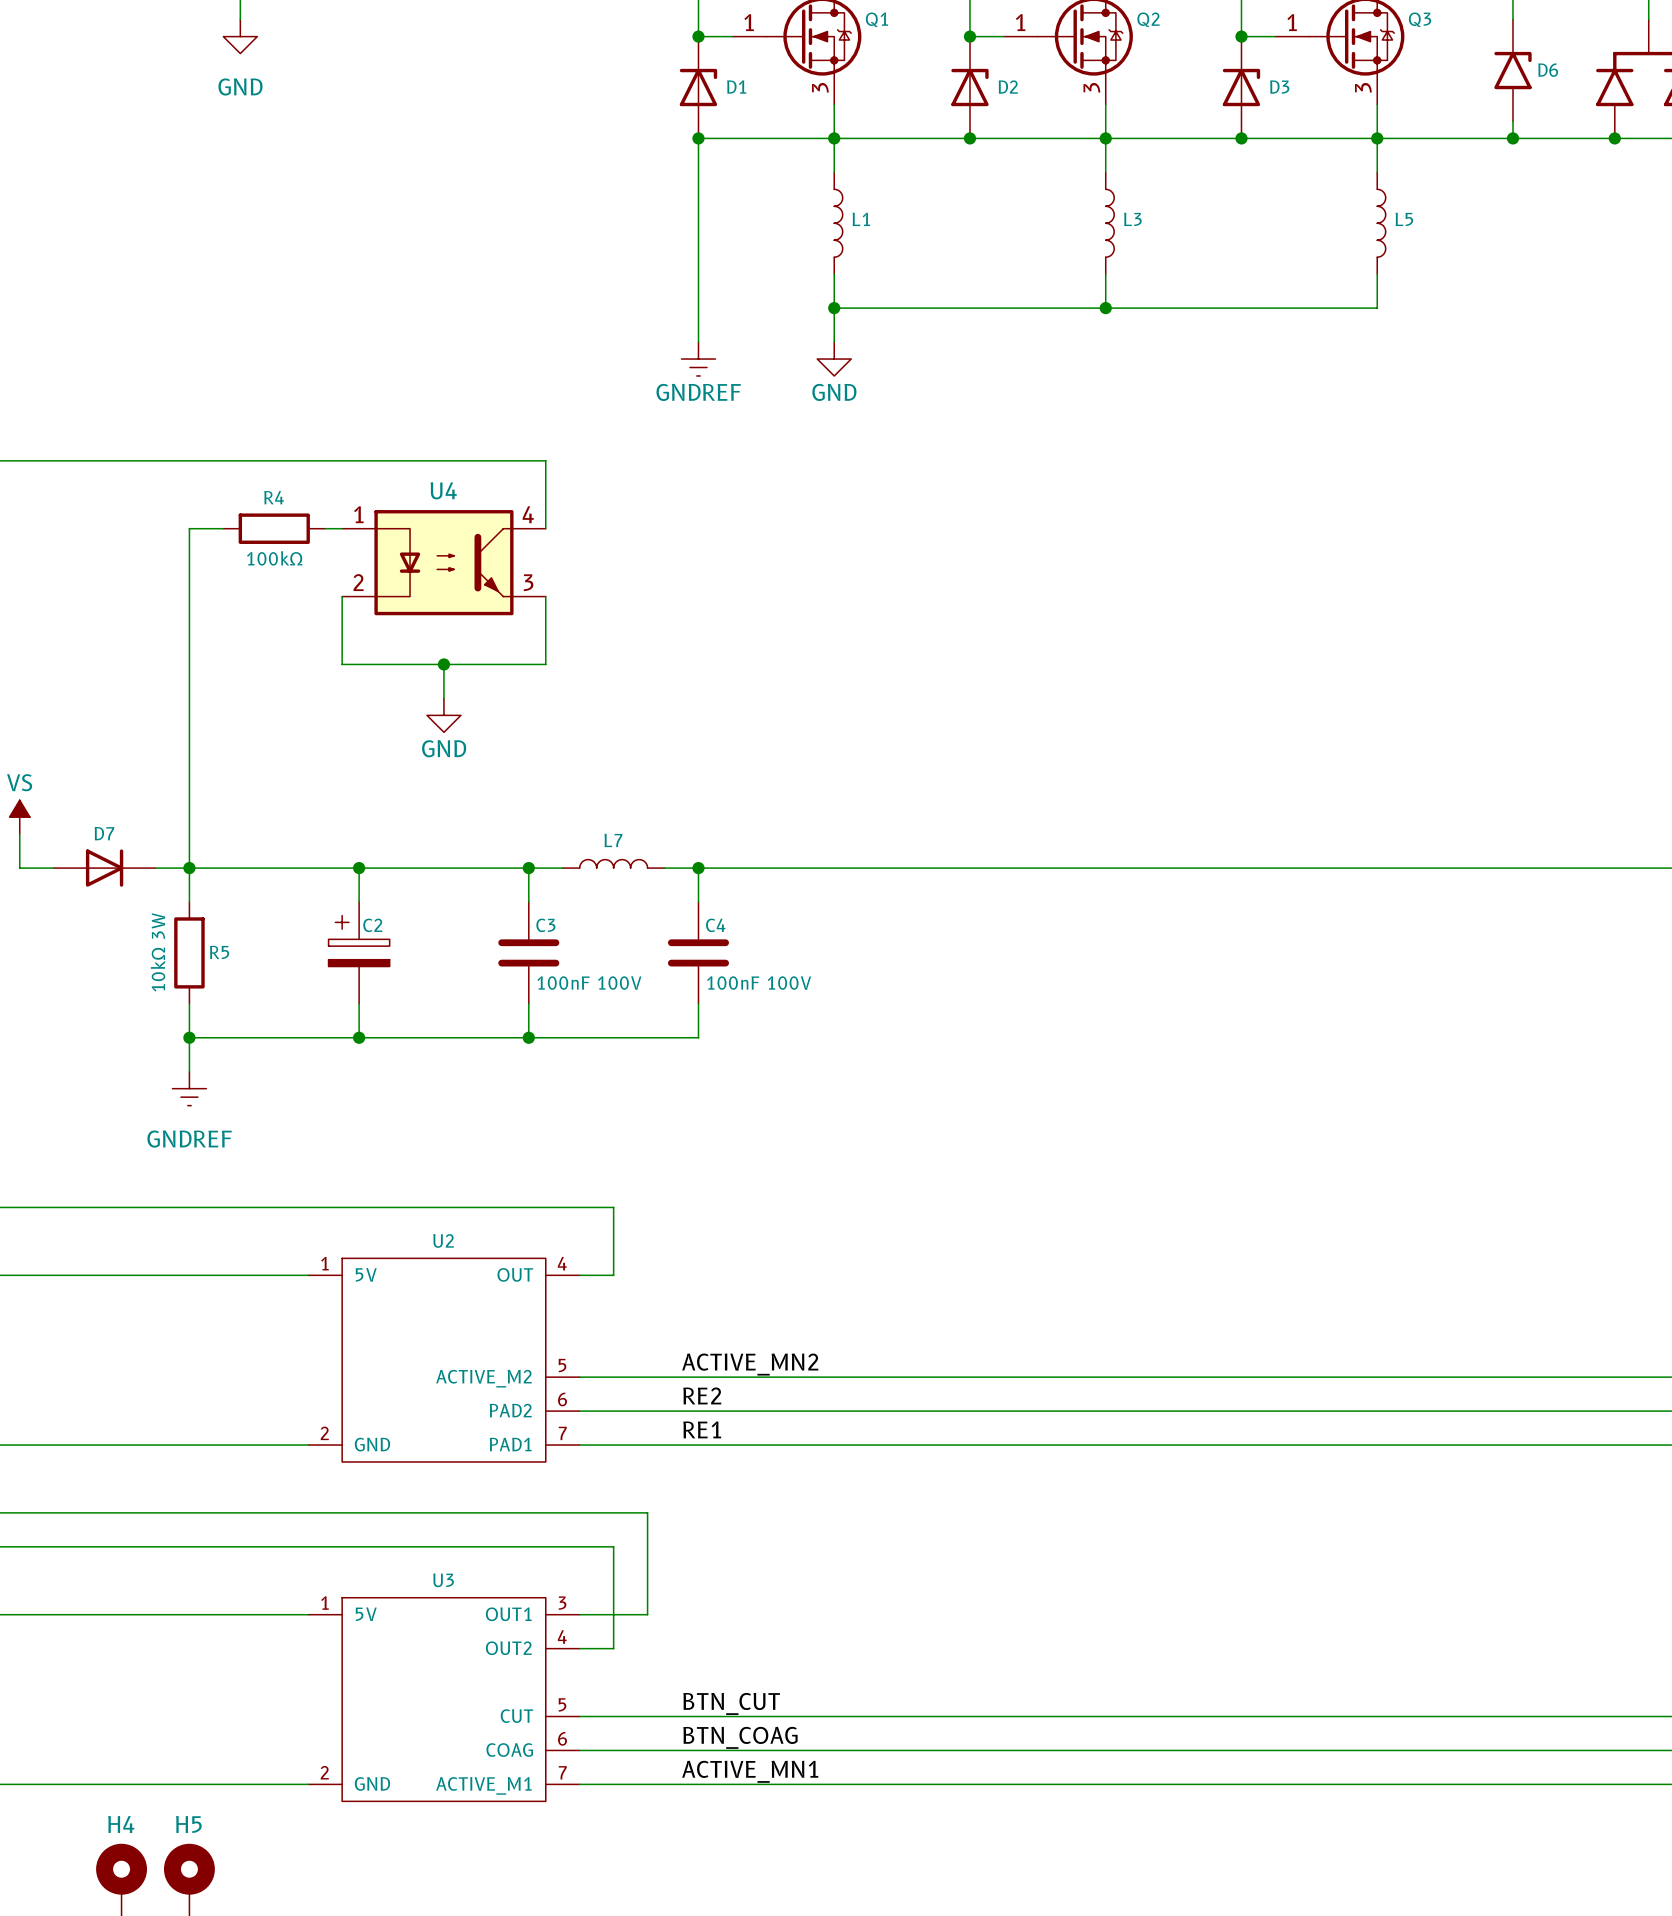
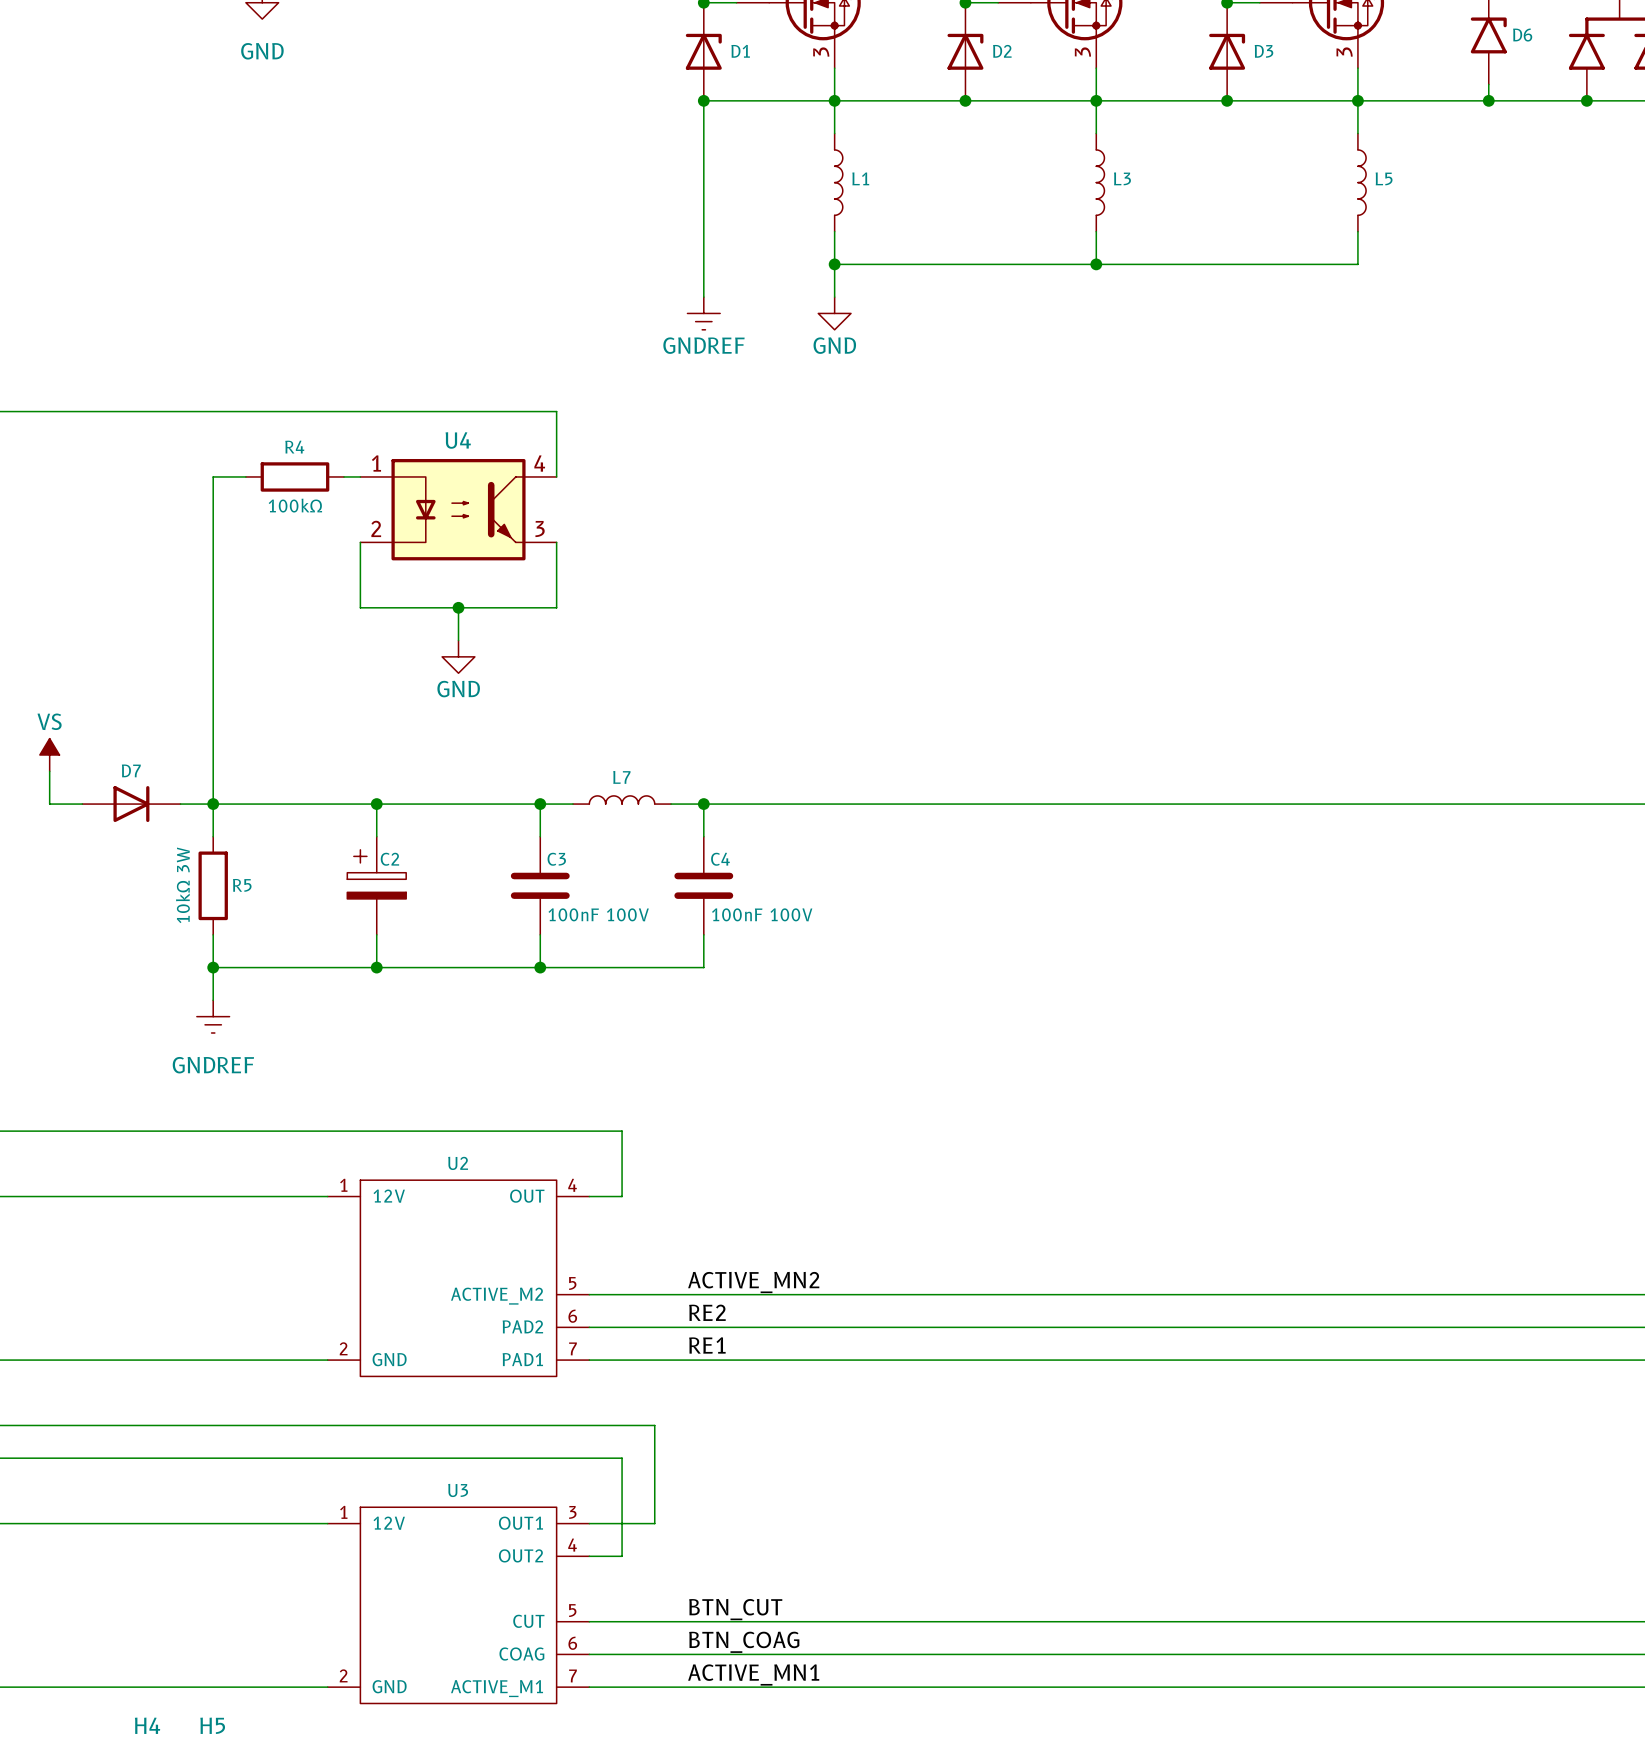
U2 pin name: 5V (366, 1274) -> 12V (389, 1196)
U3 pin name: 5V (366, 1614) -> 12V (389, 1523)

